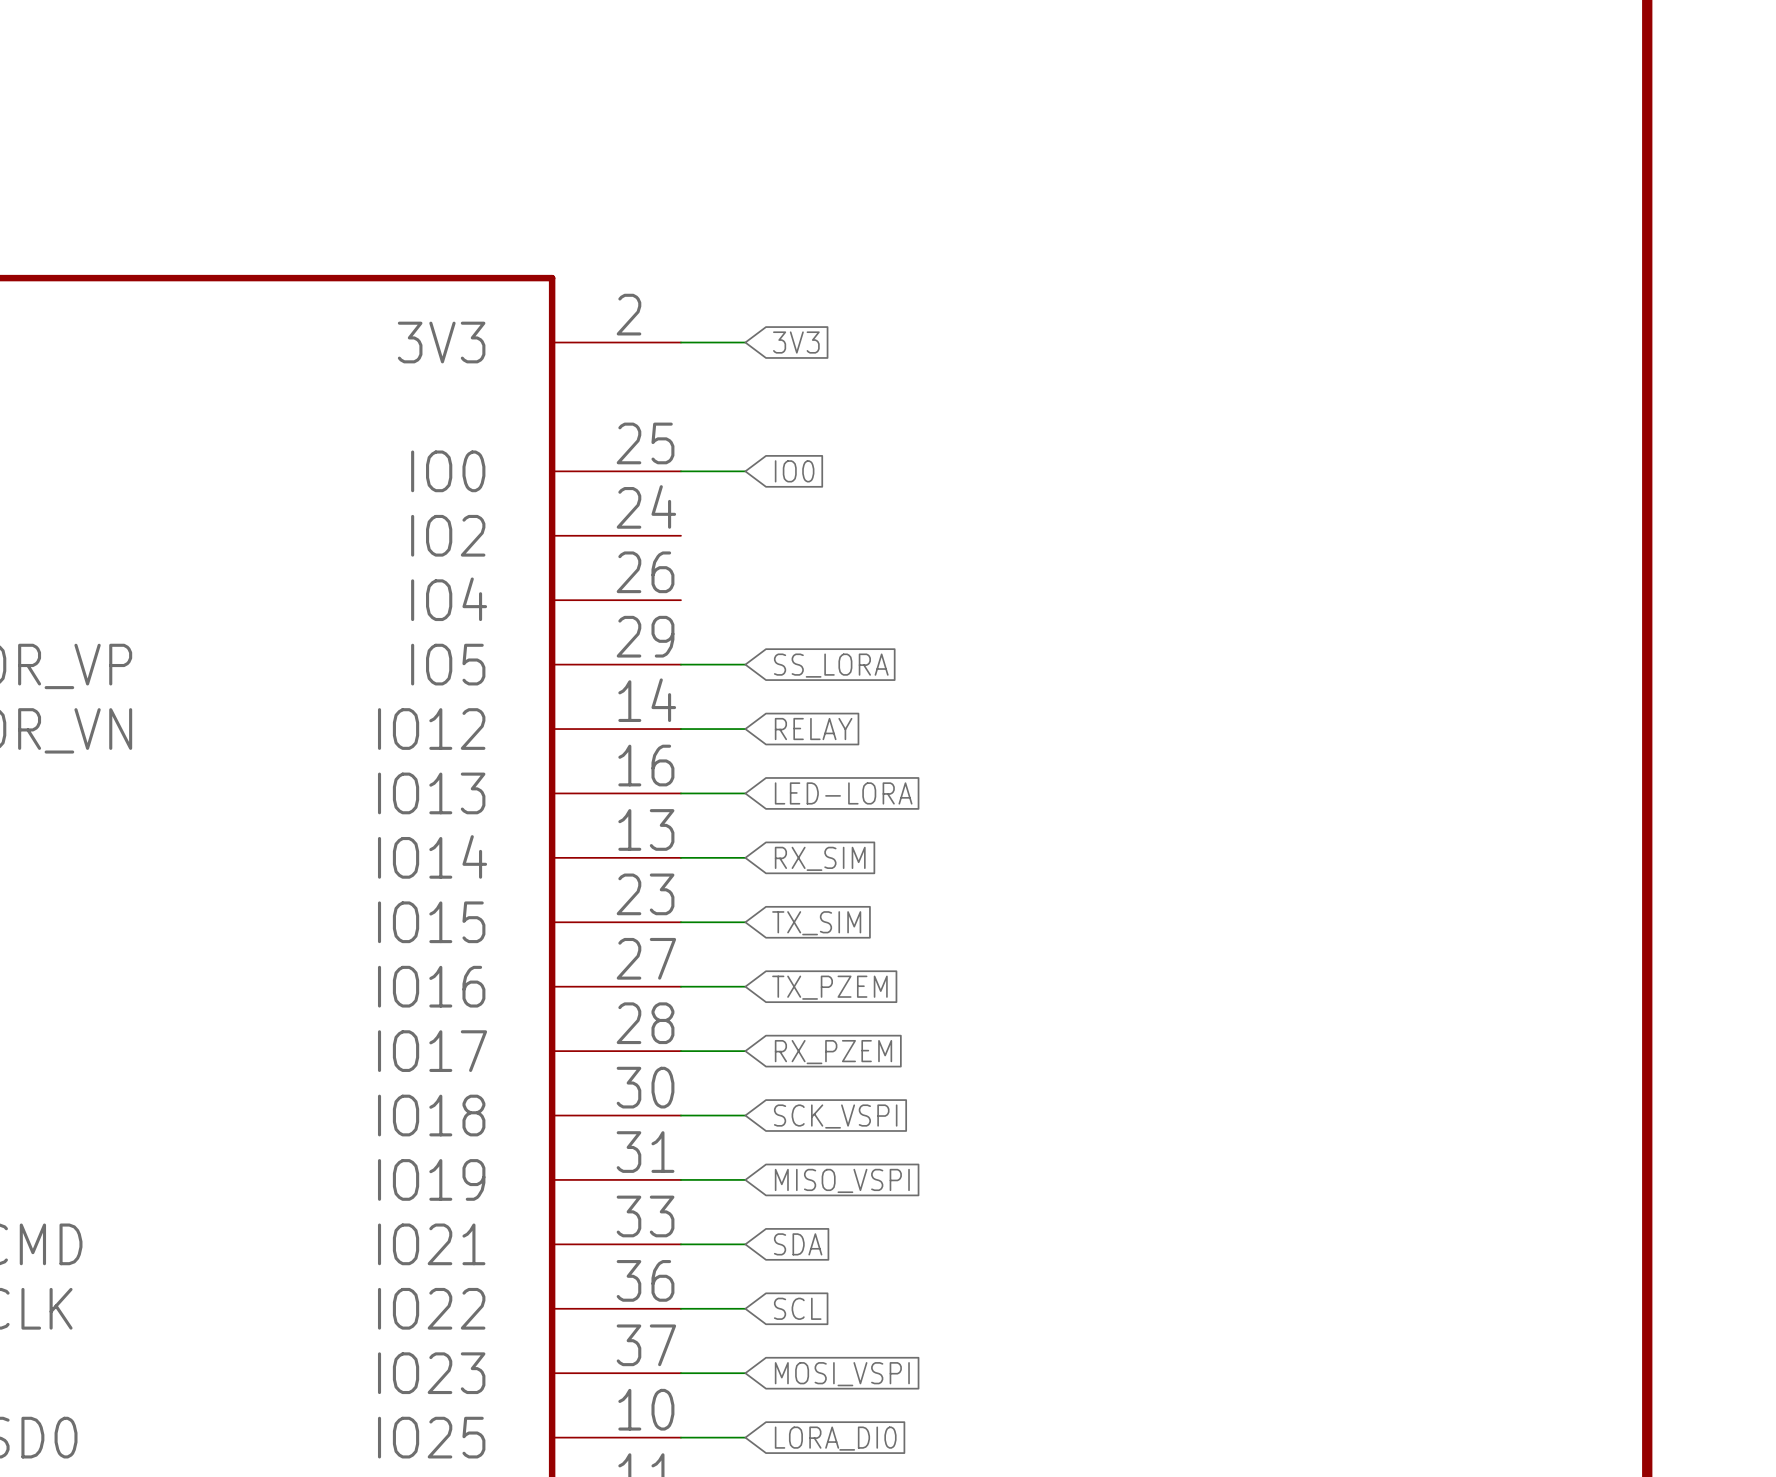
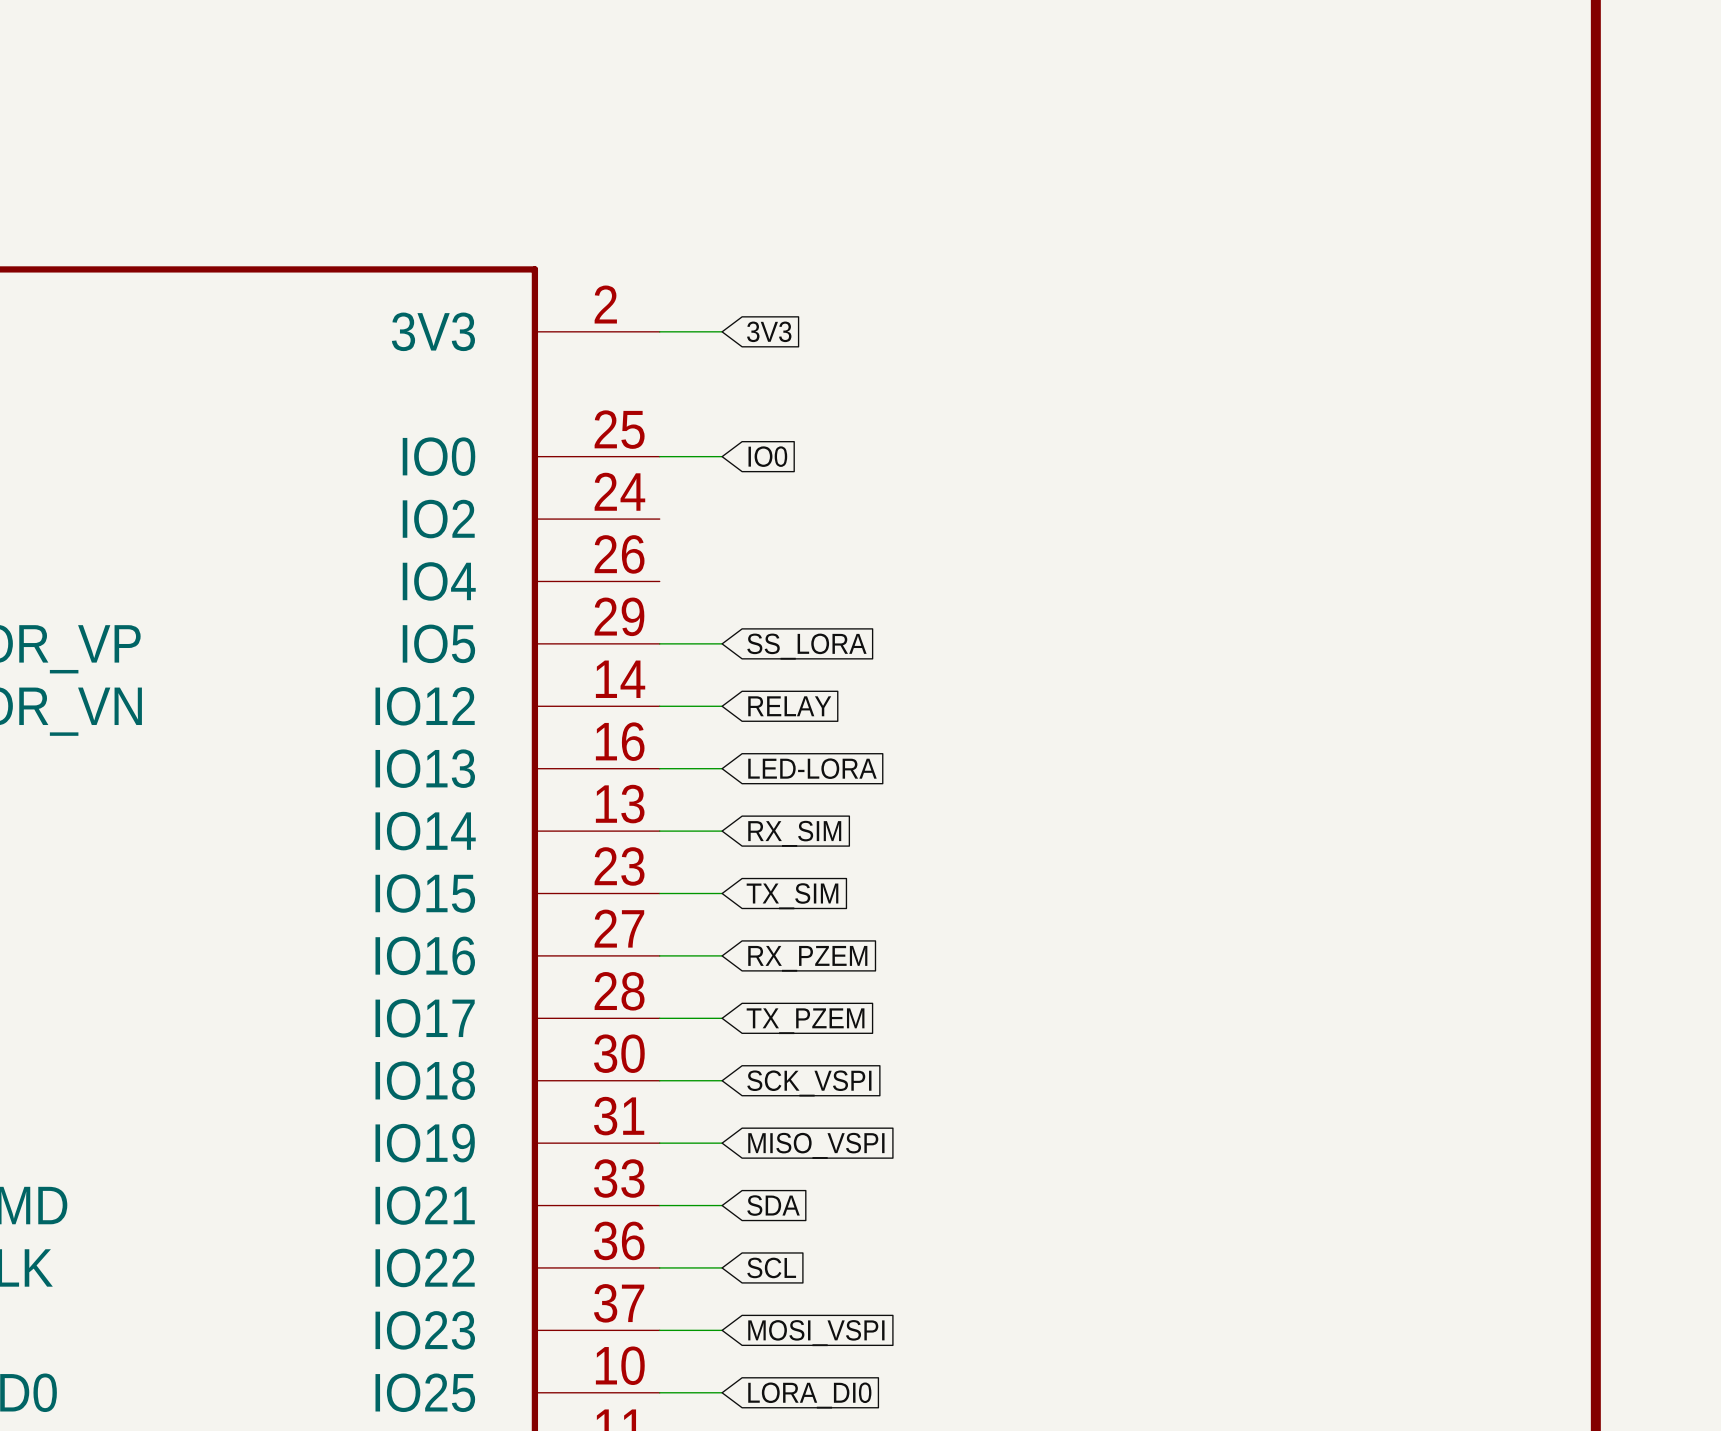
global label: TX_PZEM (829, 987) -> RX_PZEM (807, 958)
global label: RX_PZEM (833, 1052) -> TX_PZEM (805, 1021)

